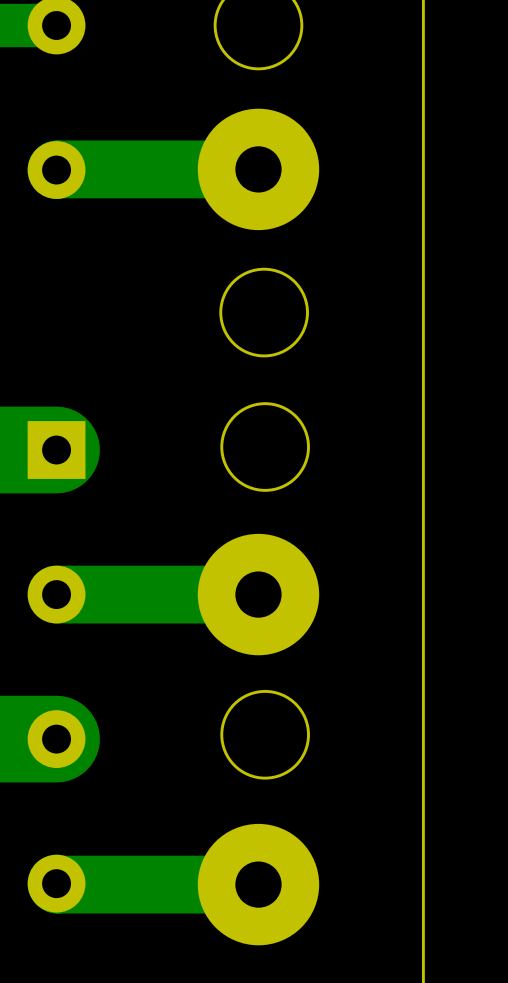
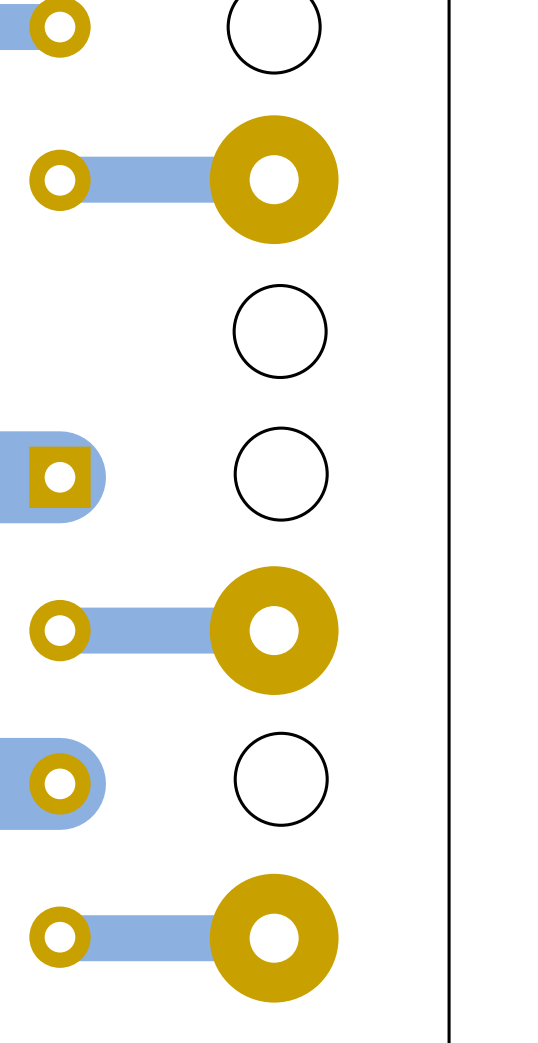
bottom track width: thick (258, 169) (56, 170) -> thin (274, 179) (59, 180)
bottom track width: thick (258, 594) (56, 594) -> thin (274, 630) (59, 630)
bottom track width: thick (56, 883) (258, 884) -> thin (59, 937) (274, 938)

